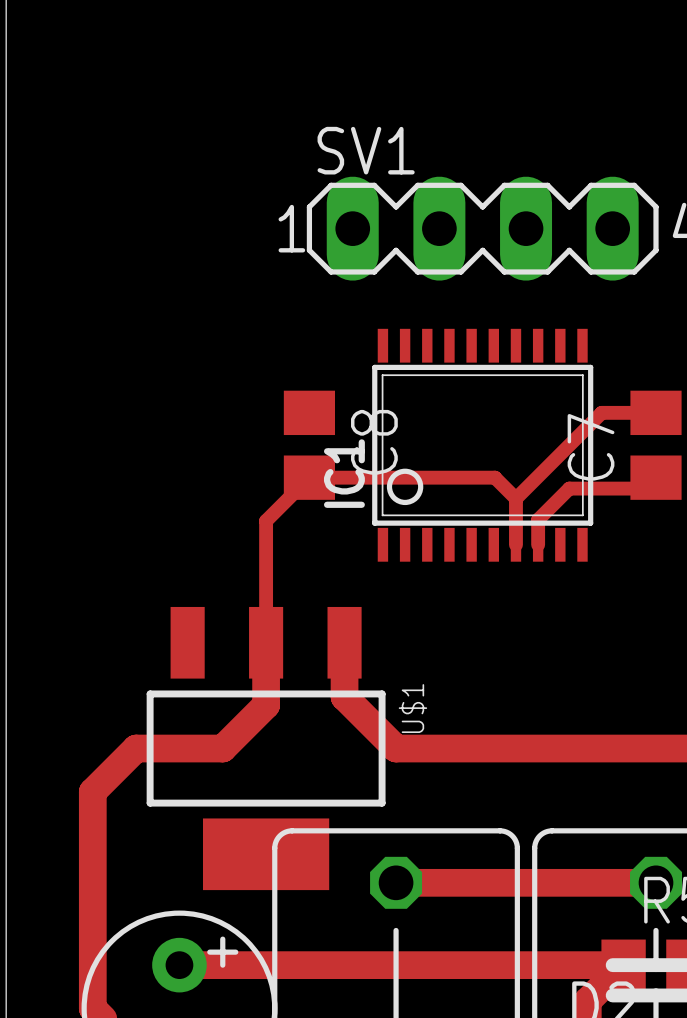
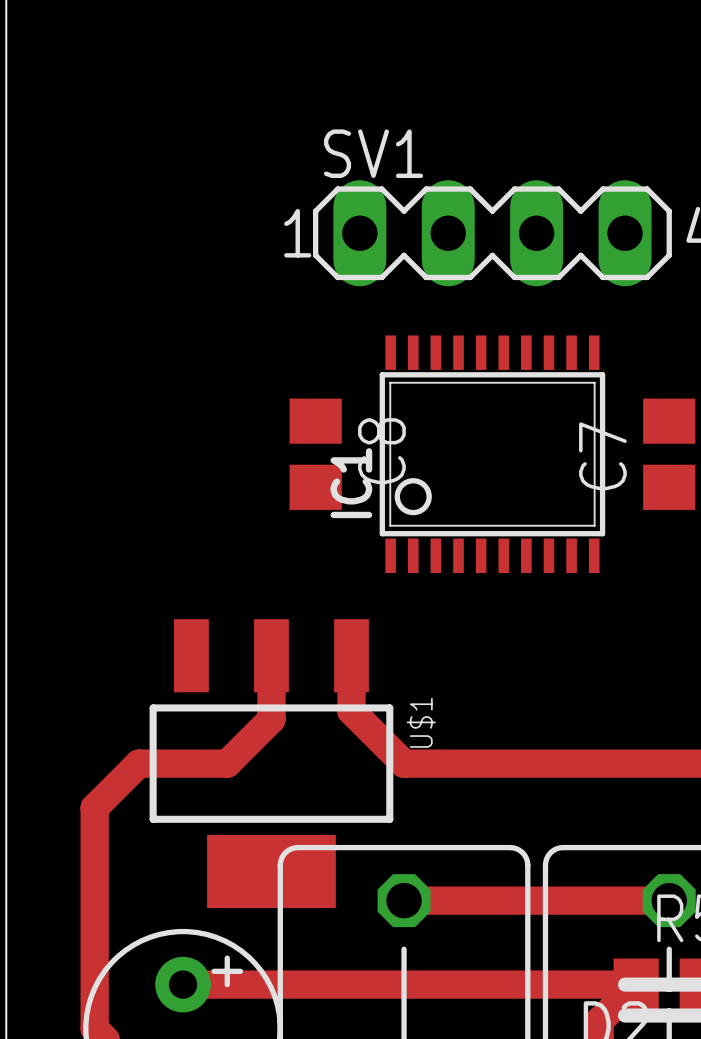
track: (656, 412) (601, 412) (515, 498) -> none
track: (656, 477) (645, 488) (569, 488) (538, 519) (538, 544) -> none
track: (515, 498) (515, 544) -> none
track: (515, 498) (494, 477) (309, 477) (266, 520) (266, 642) -> none

